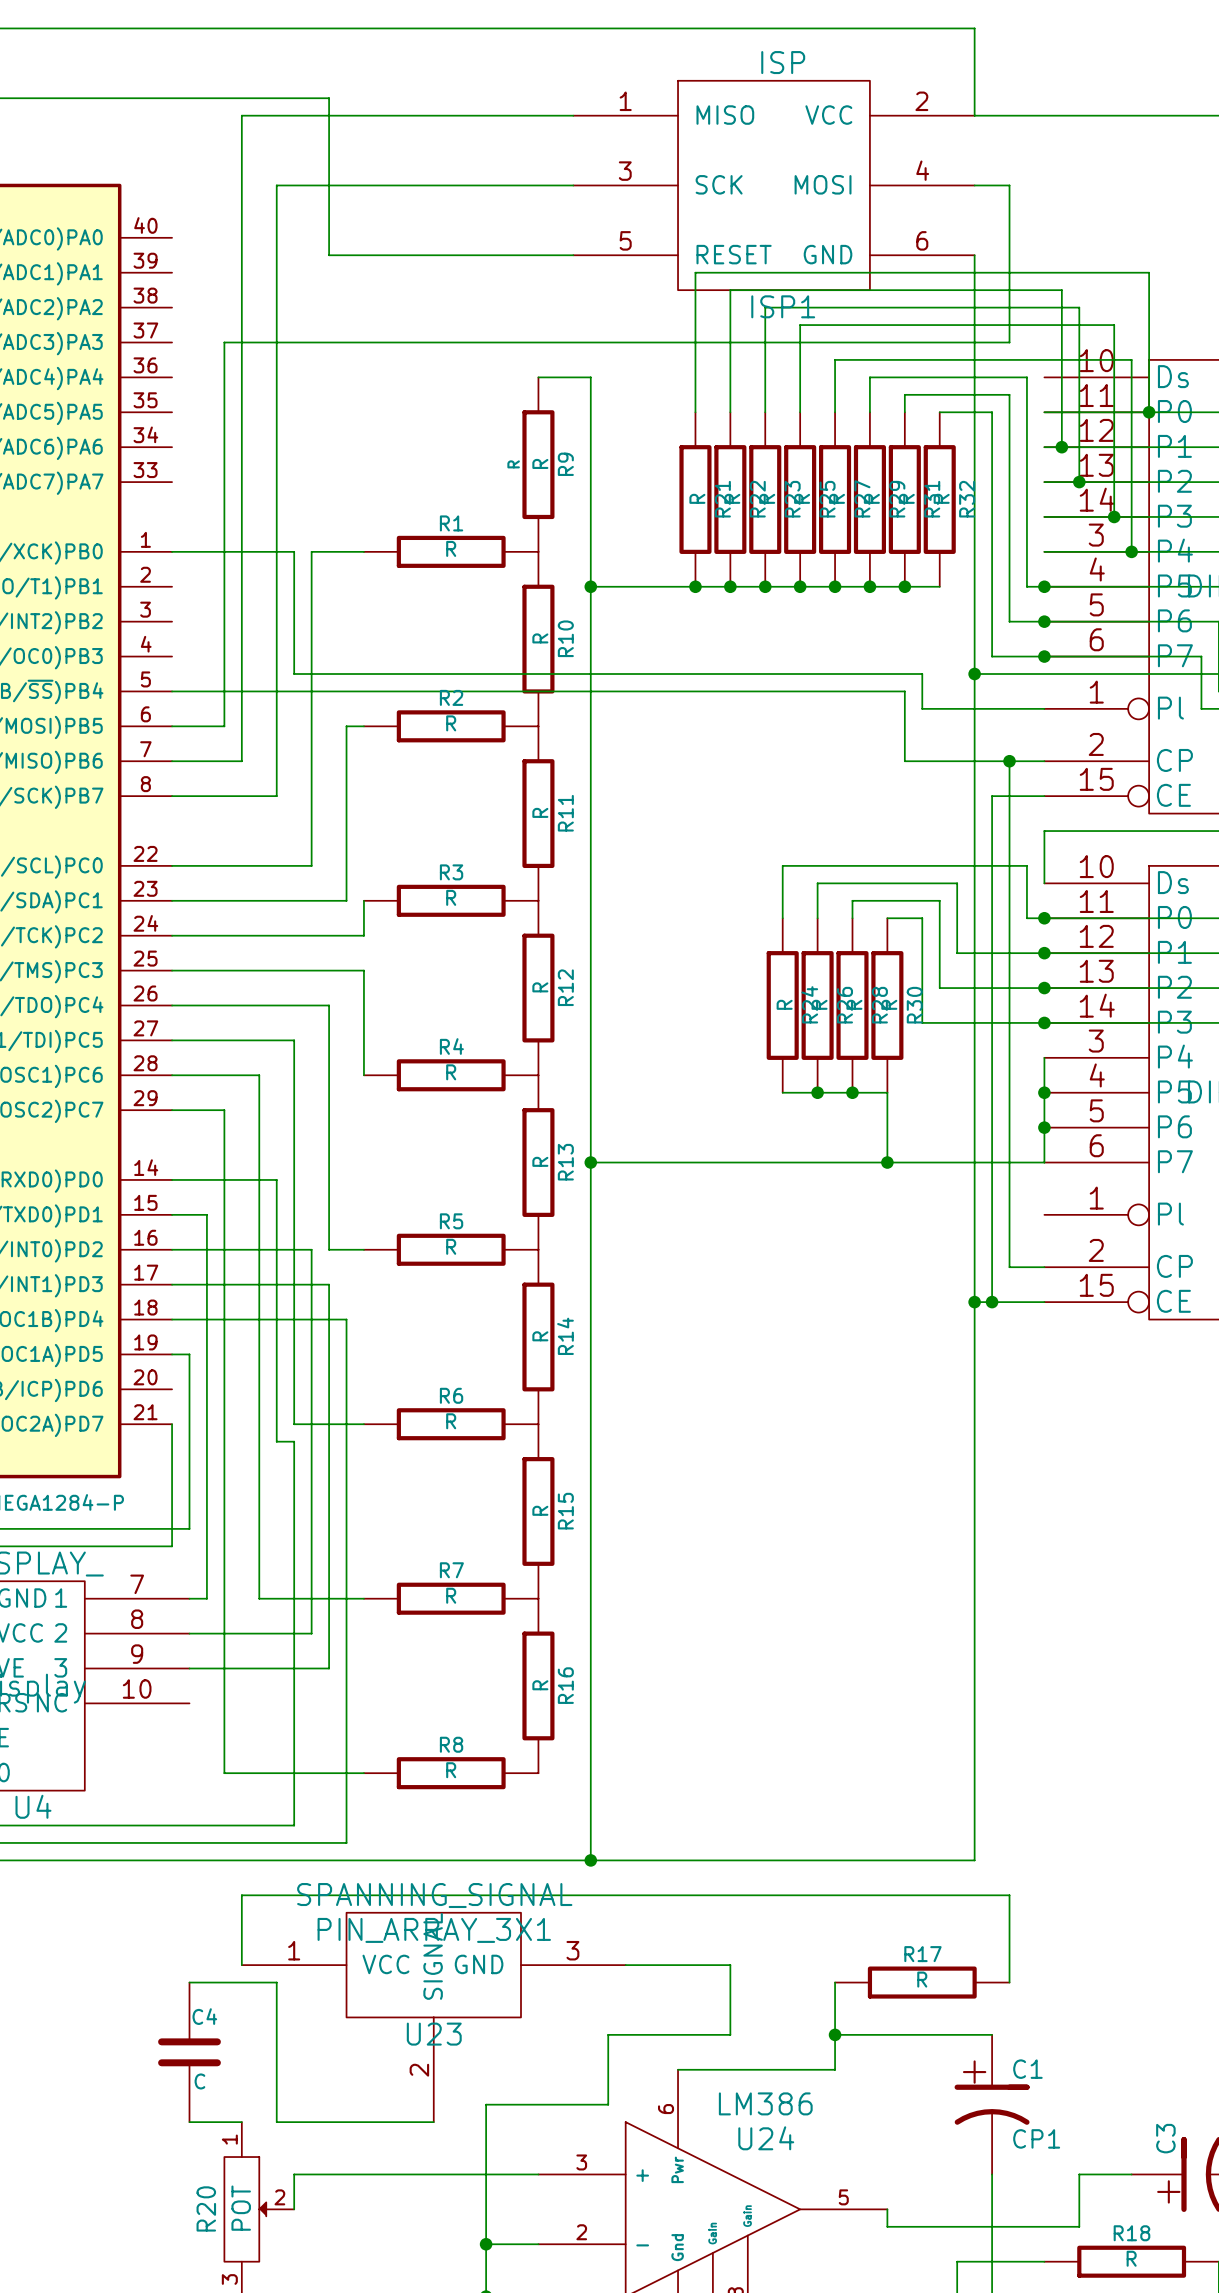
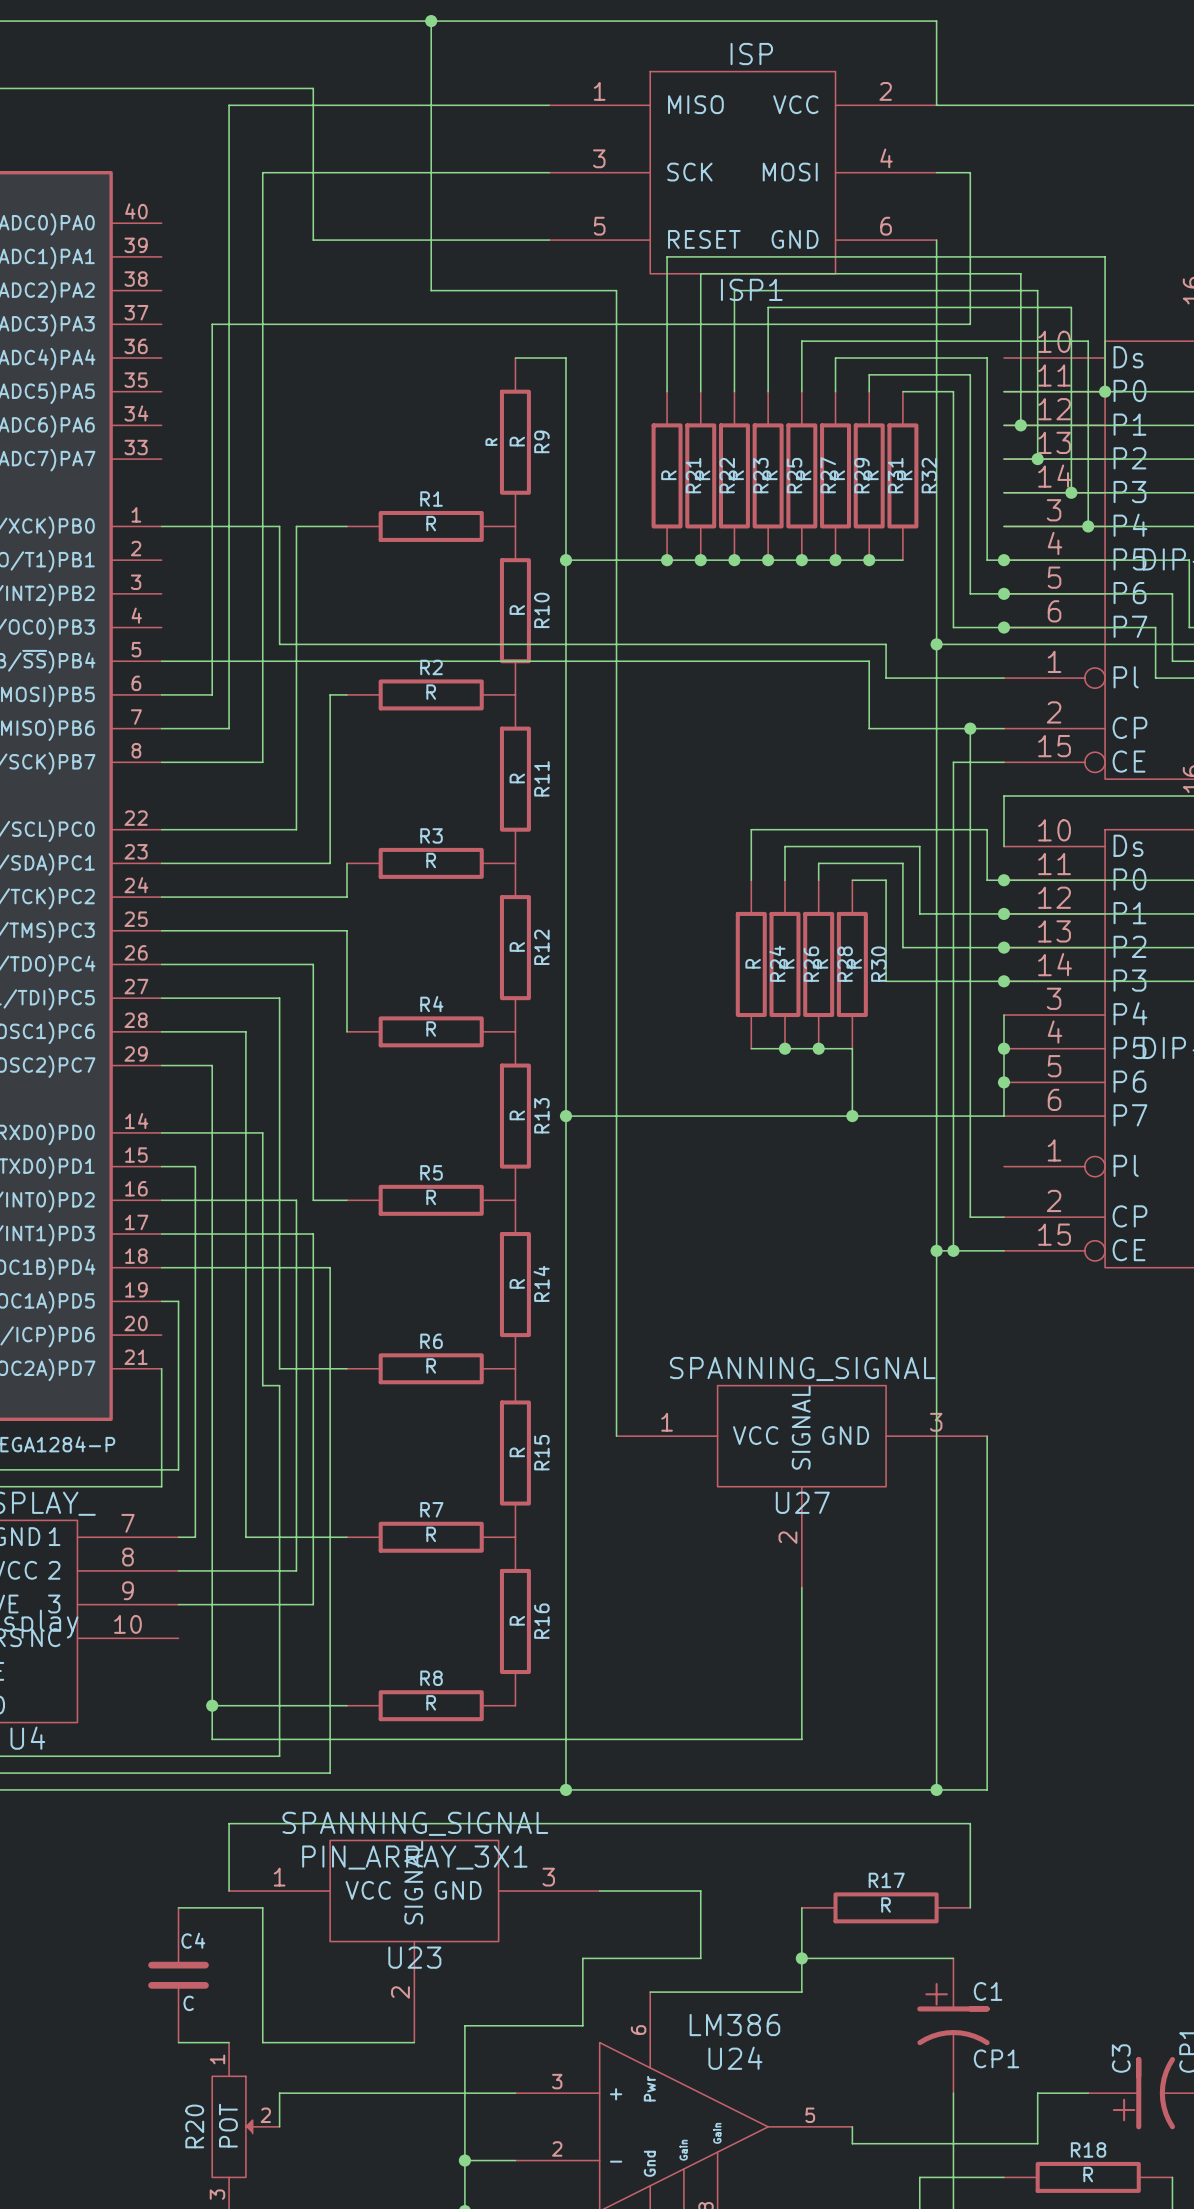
wire: none -> (431, 21) (431, 290) (616, 290) (616, 1436)
junction: none -> (431, 21)
wire: none -> (987, 1436) (987, 1789) (936, 1789)
U27: none -> SPANNING_SIGNAL (801, 1486)
wire: none -> (801, 1587) (801, 1739) (212, 1739) (212, 1705)
junction: none -> (212, 1705)
junction: none -> (936, 1789)

